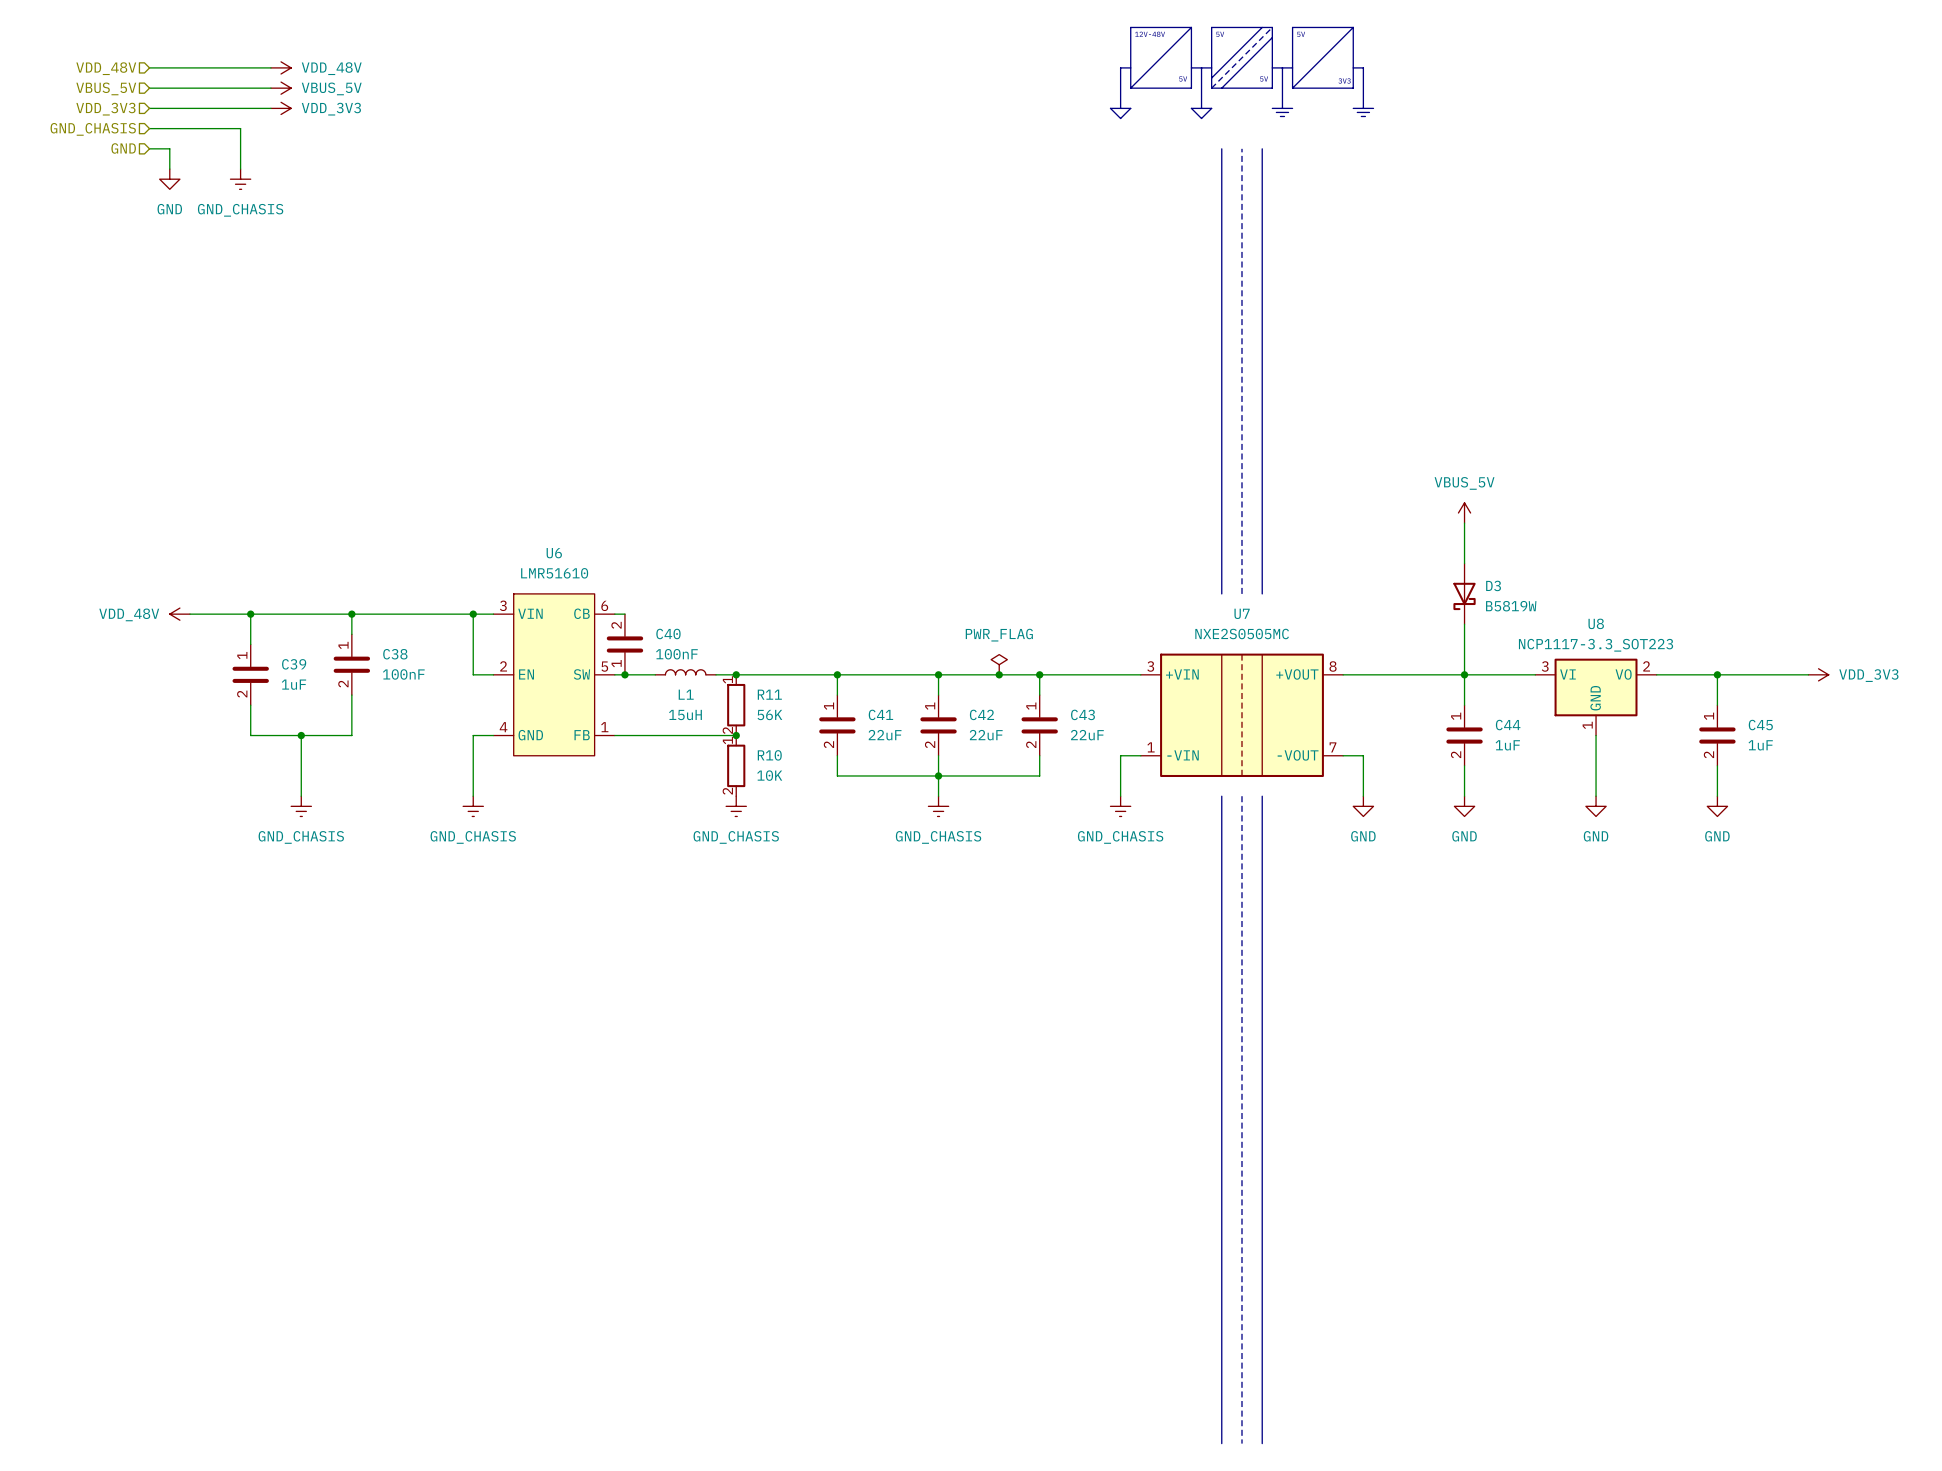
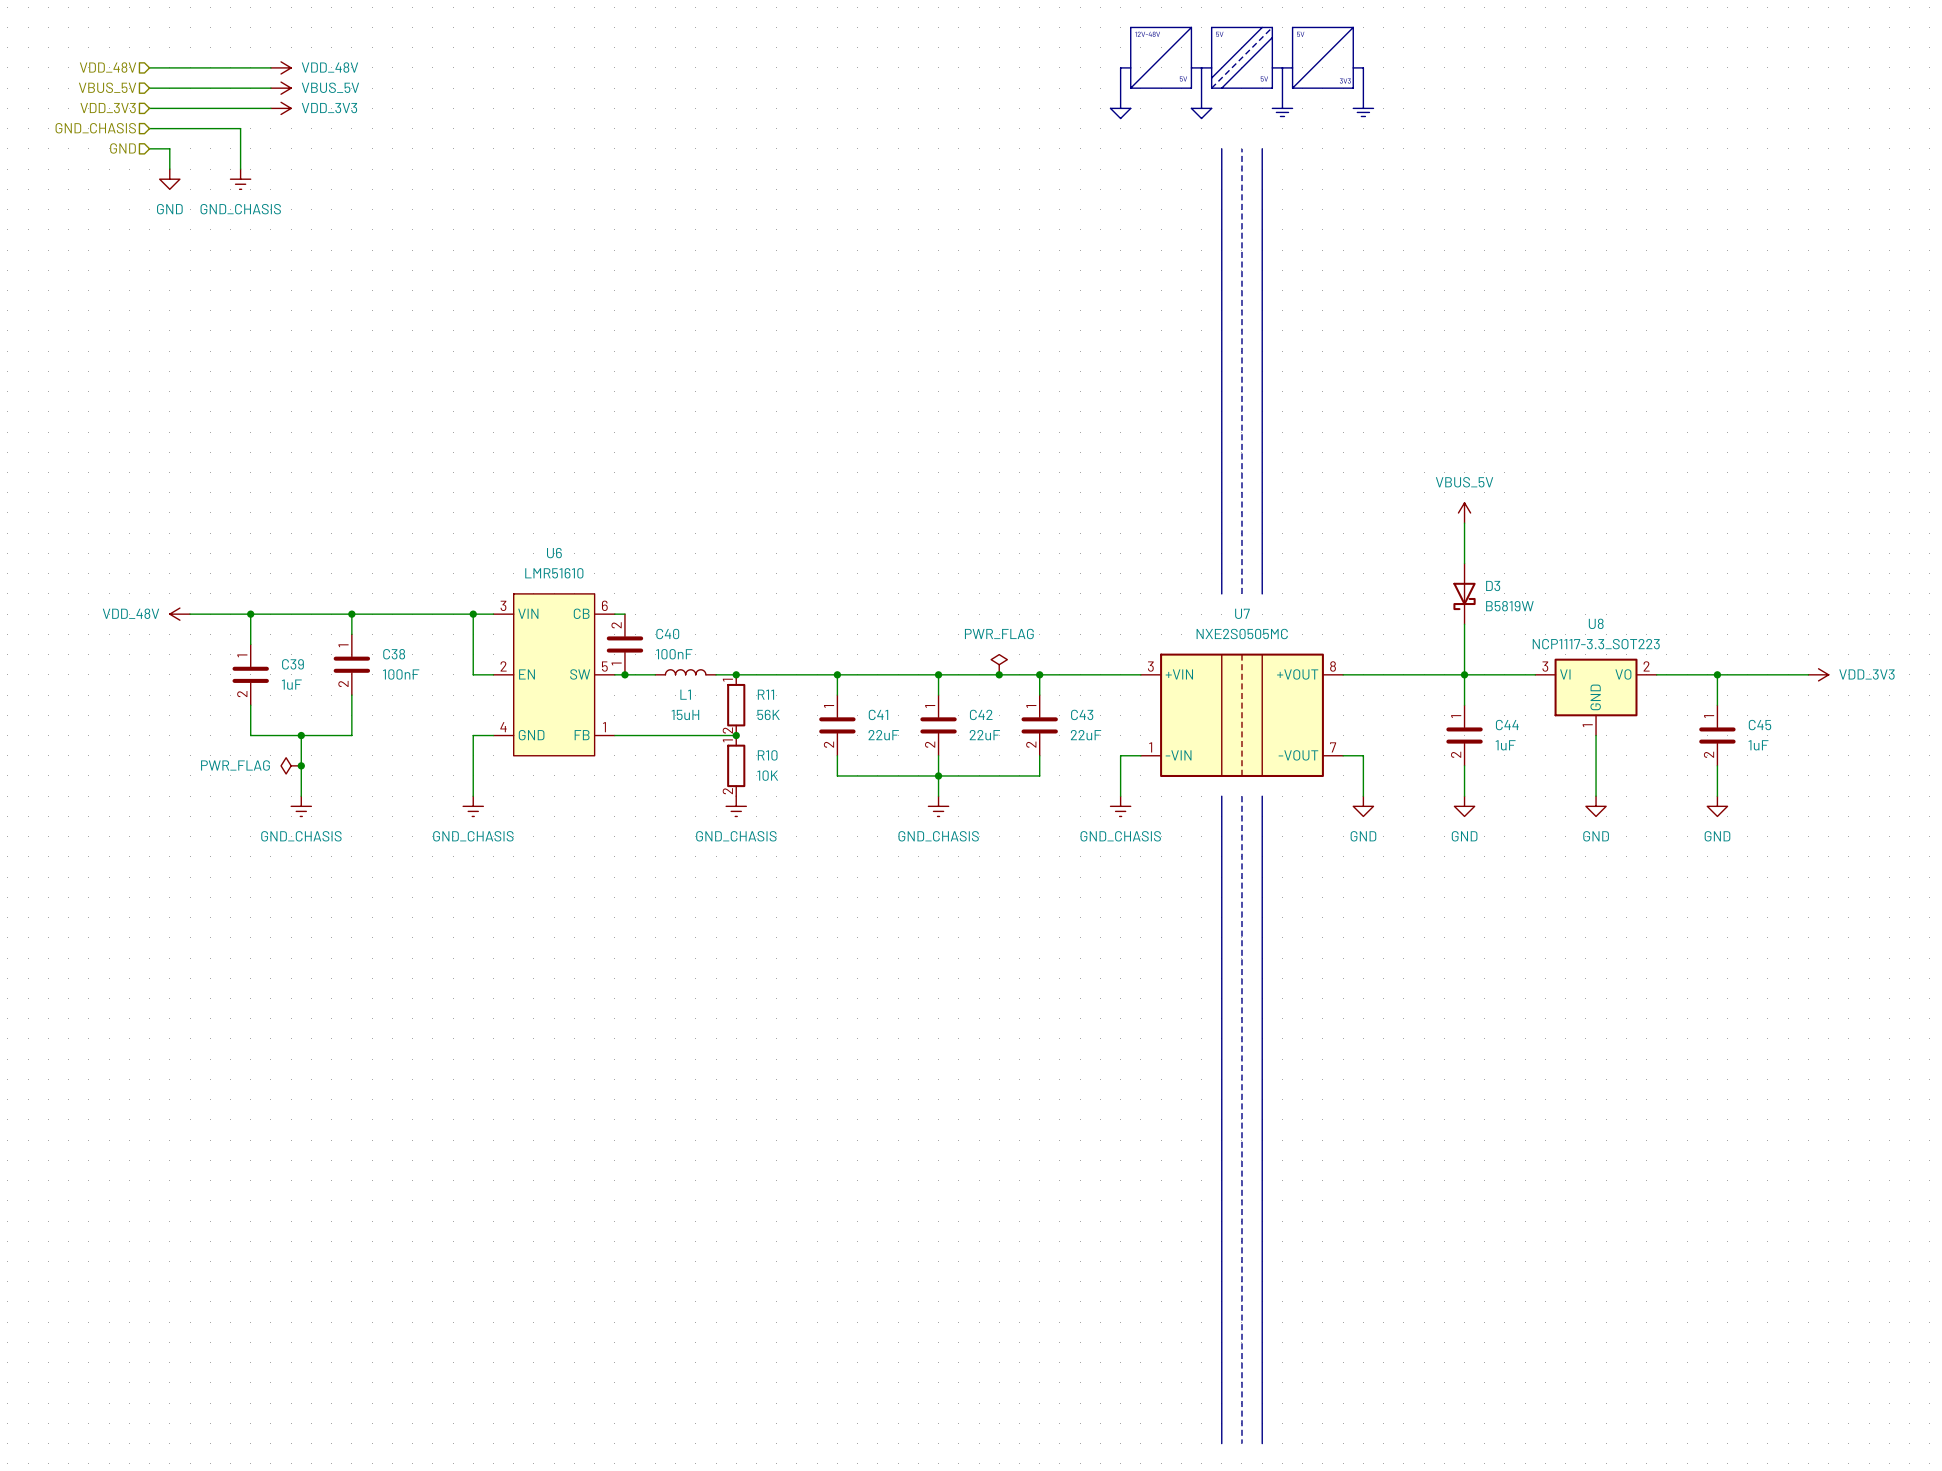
power symbol: none -> PWR_FLAG (291, 765)
junction: none -> (301, 765)

